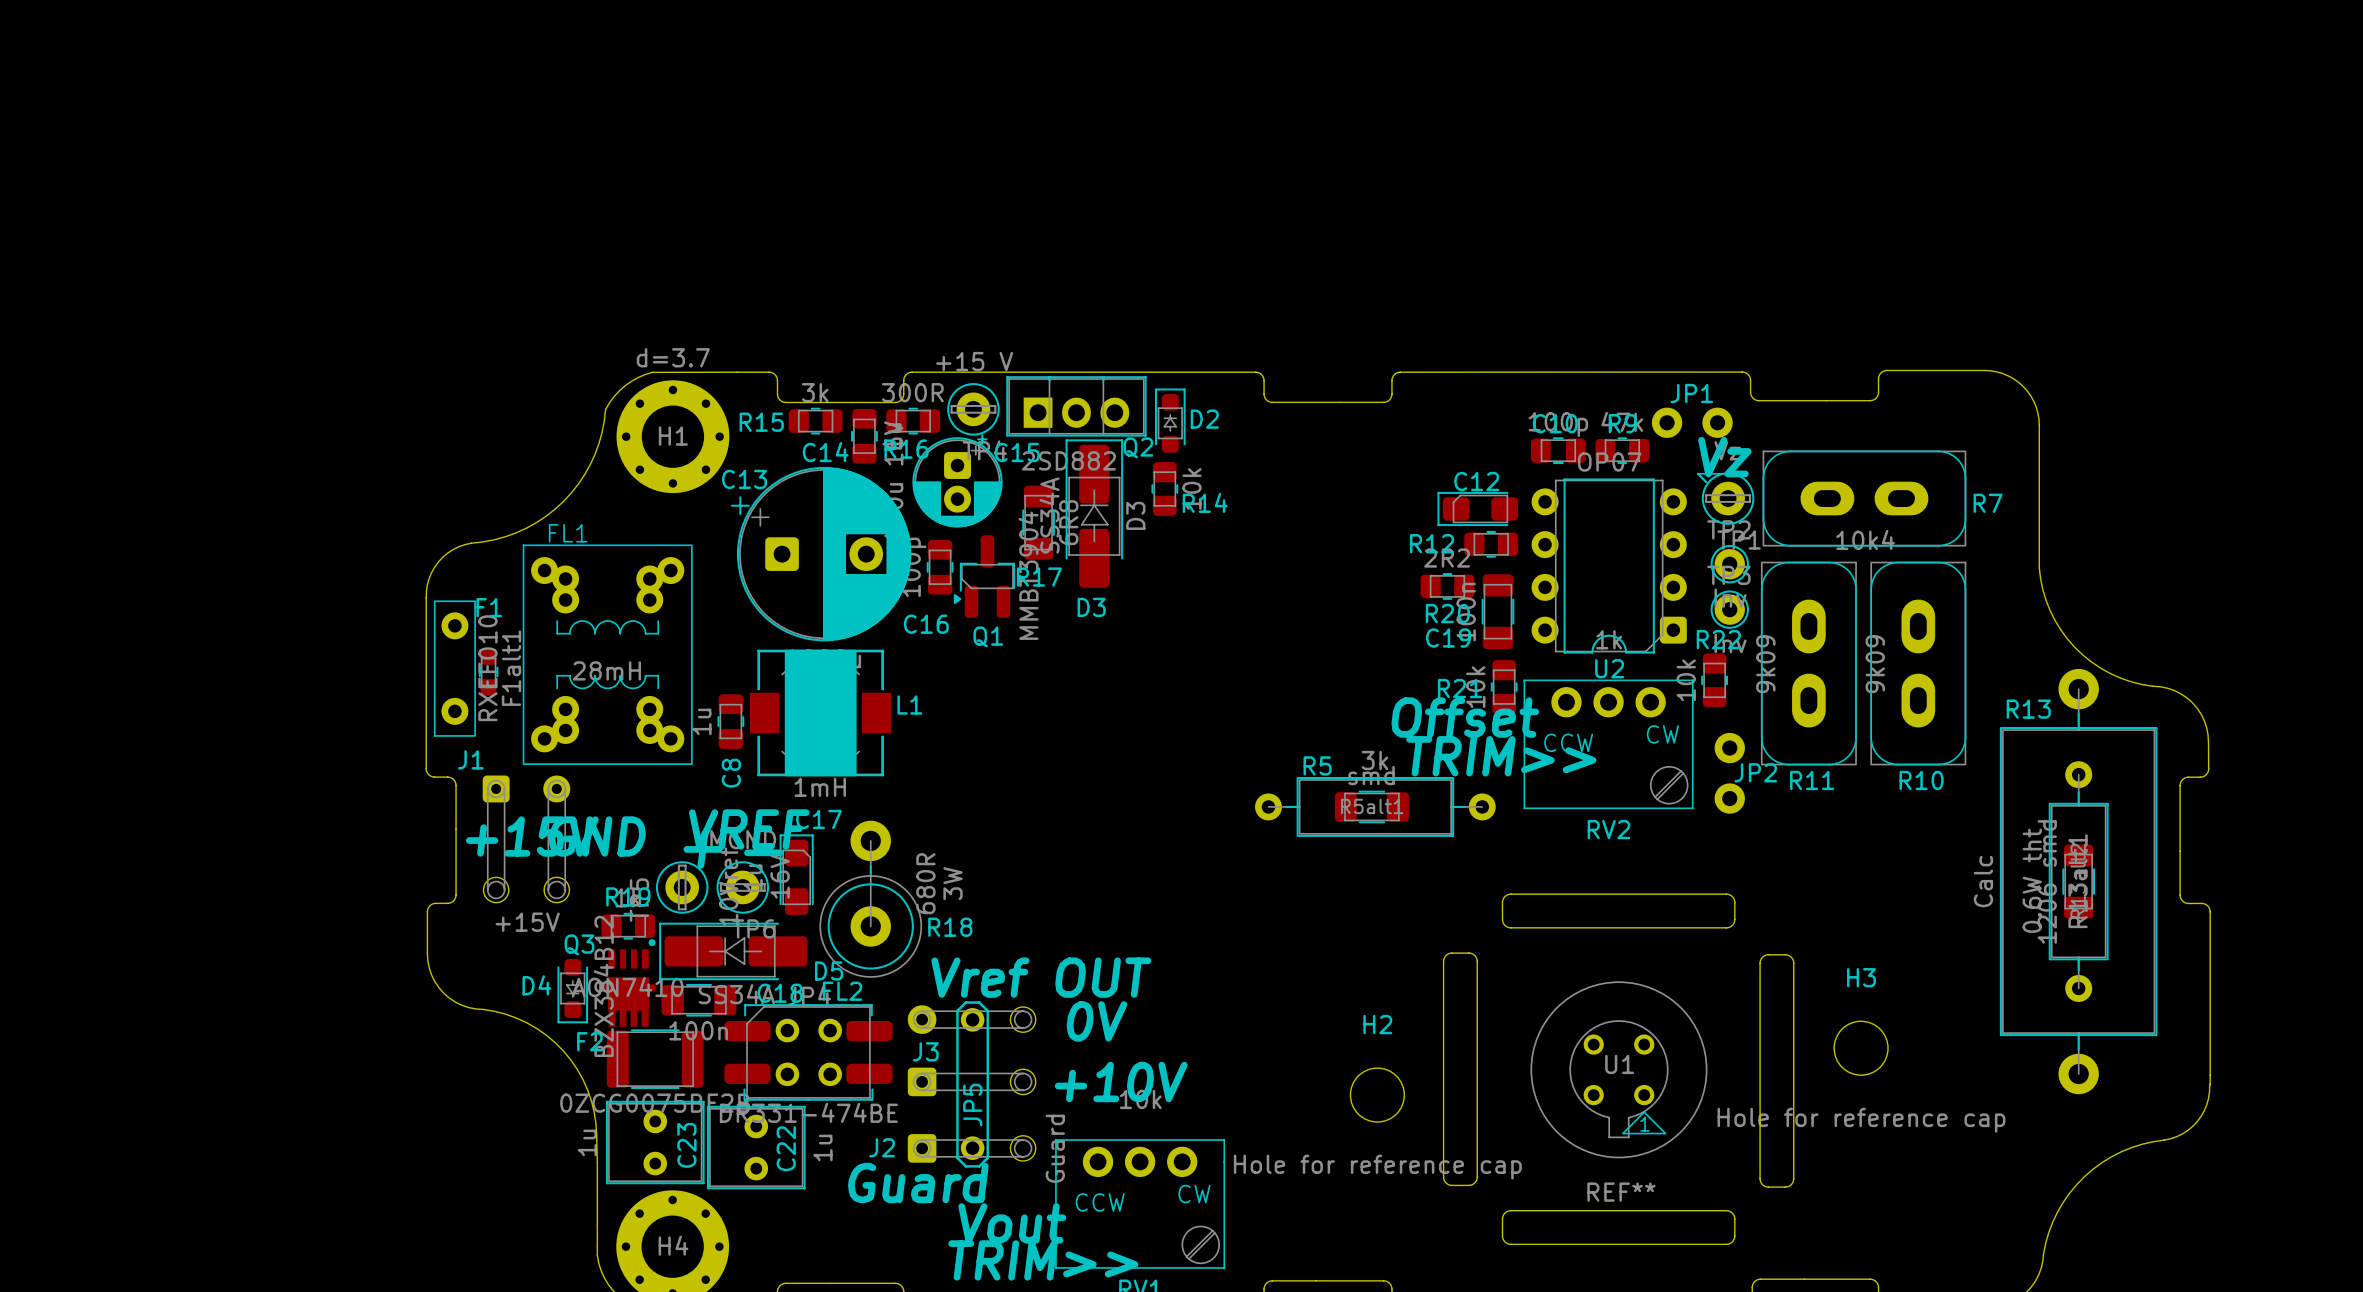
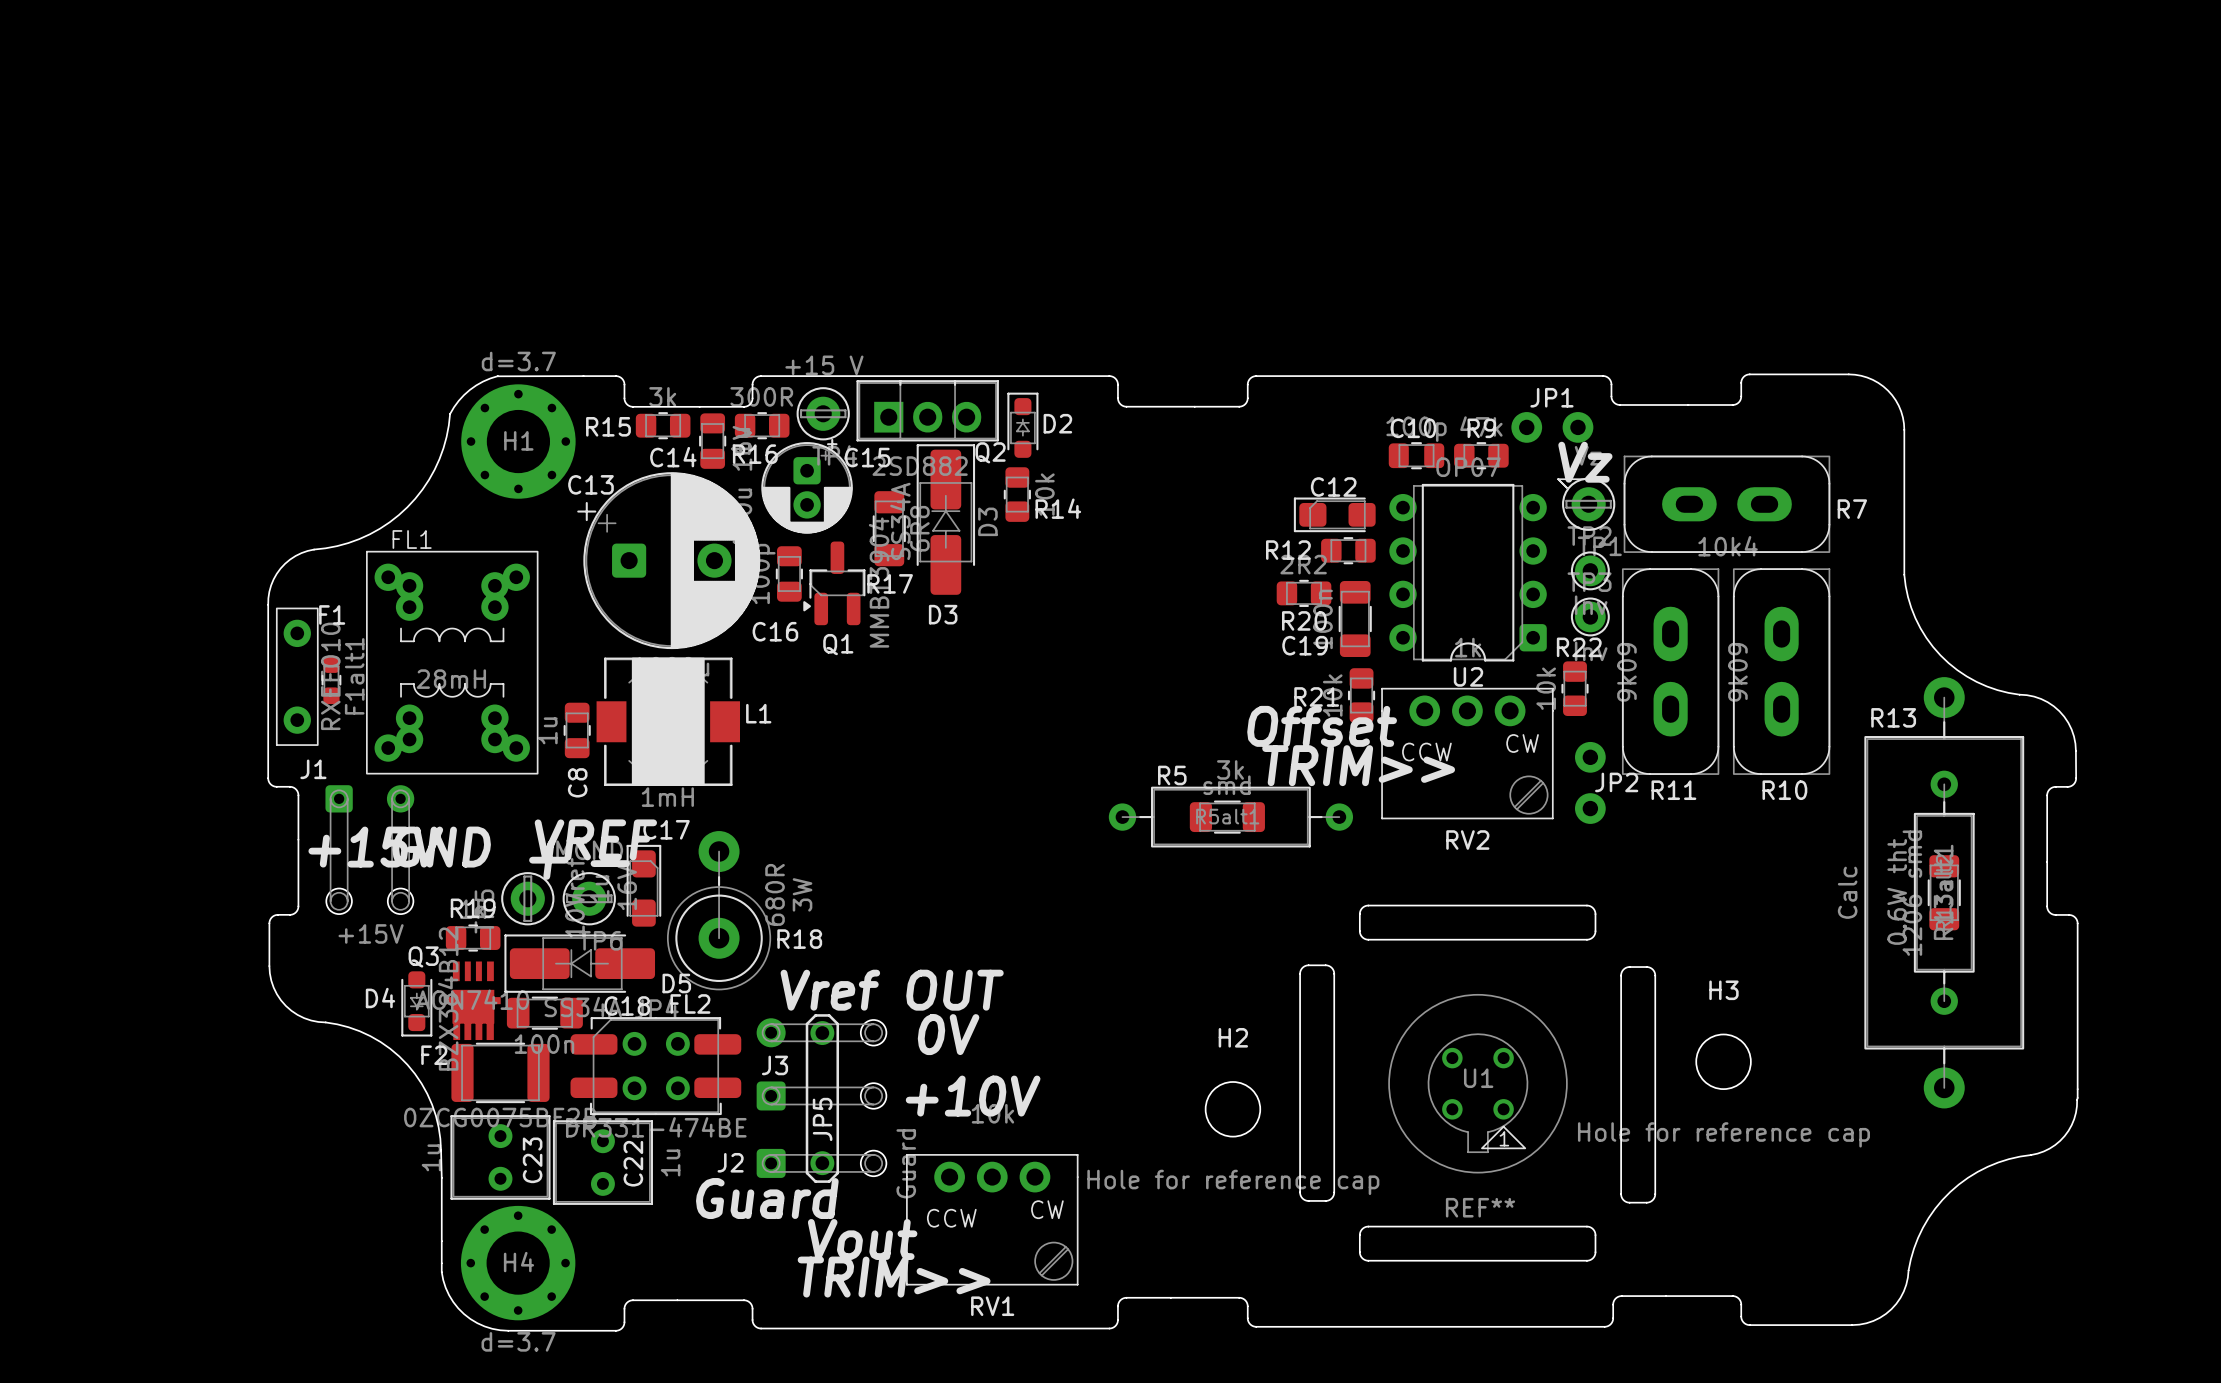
Q3 footprint: [601, 939, 656, 1027] -> [446, 961, 501, 1041]

